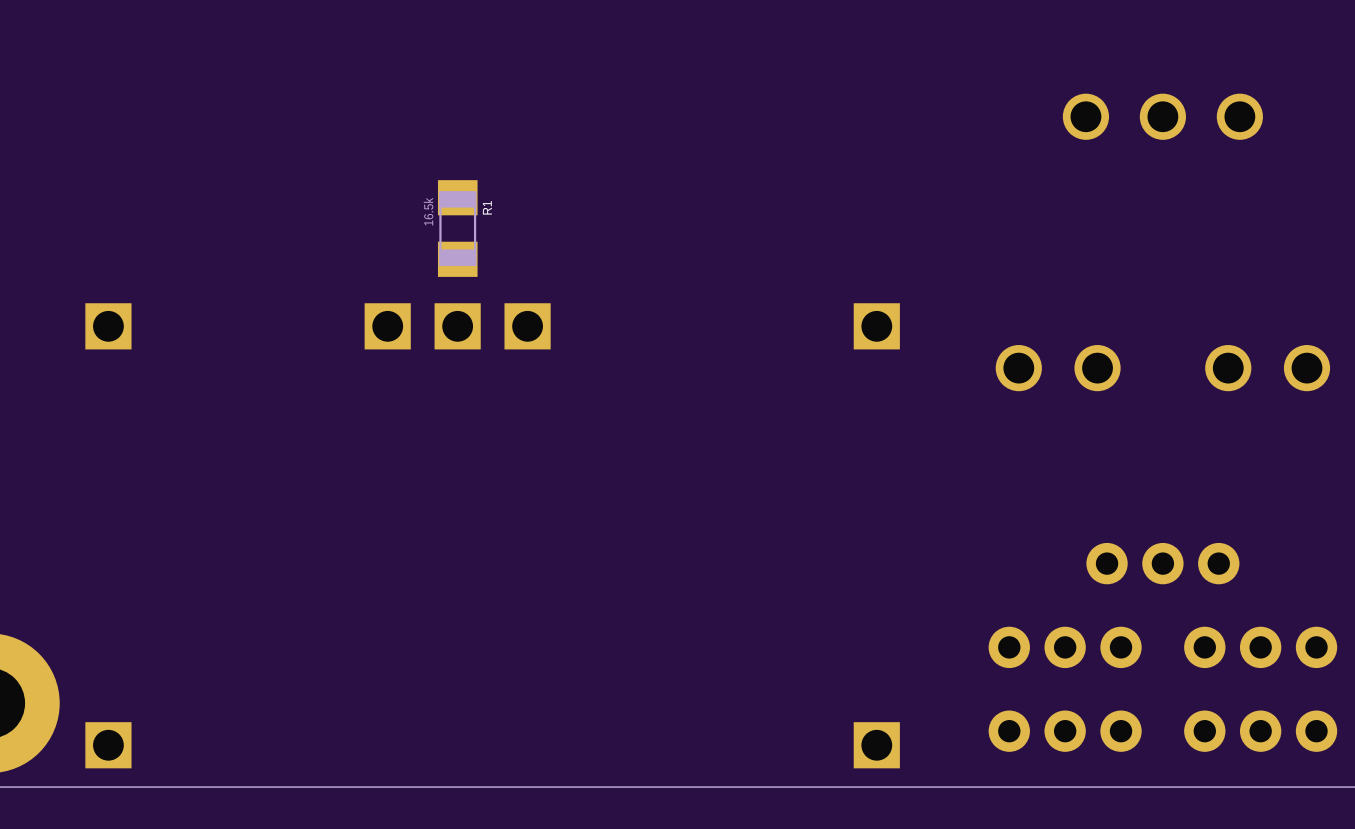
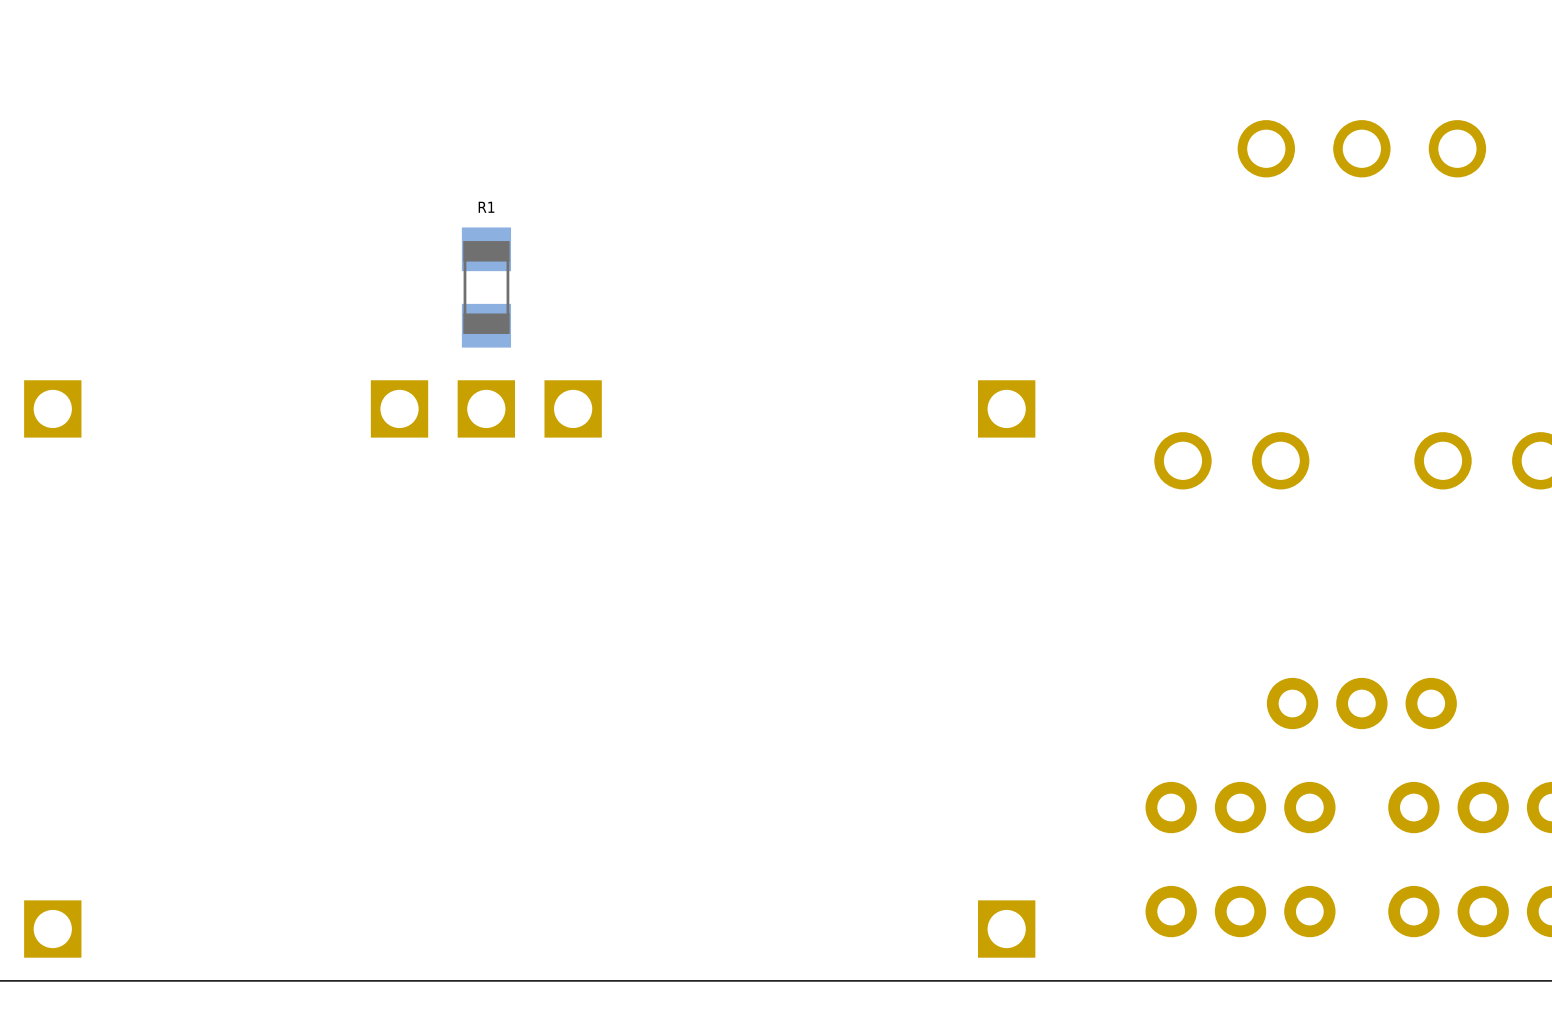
R1 name rotation: 0° (487, 207) -> 90° clockwise (486, 207)
R1 name position: R1 (487, 207) -> R1 (486, 207)
R1 value: 16.5k (428, 211) -> none

